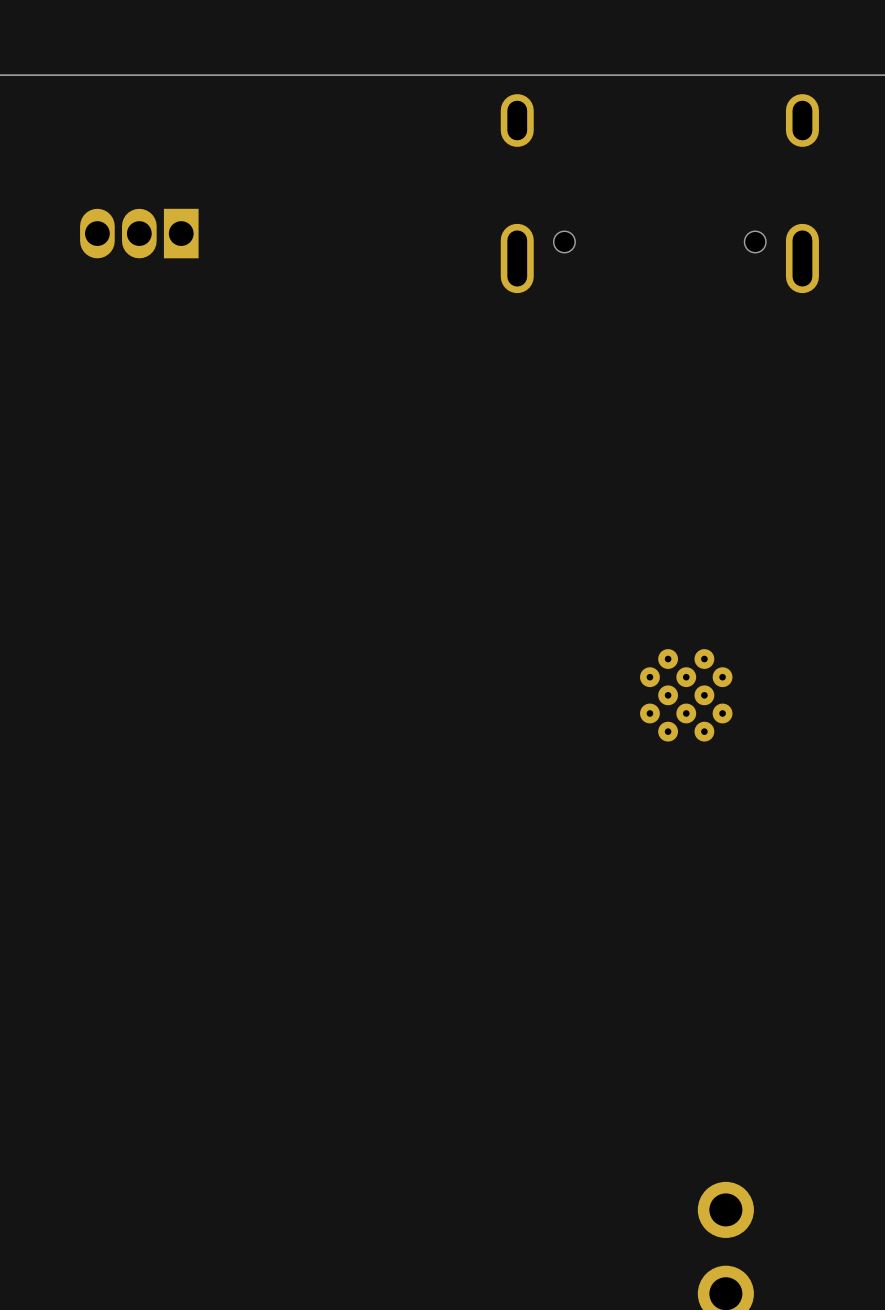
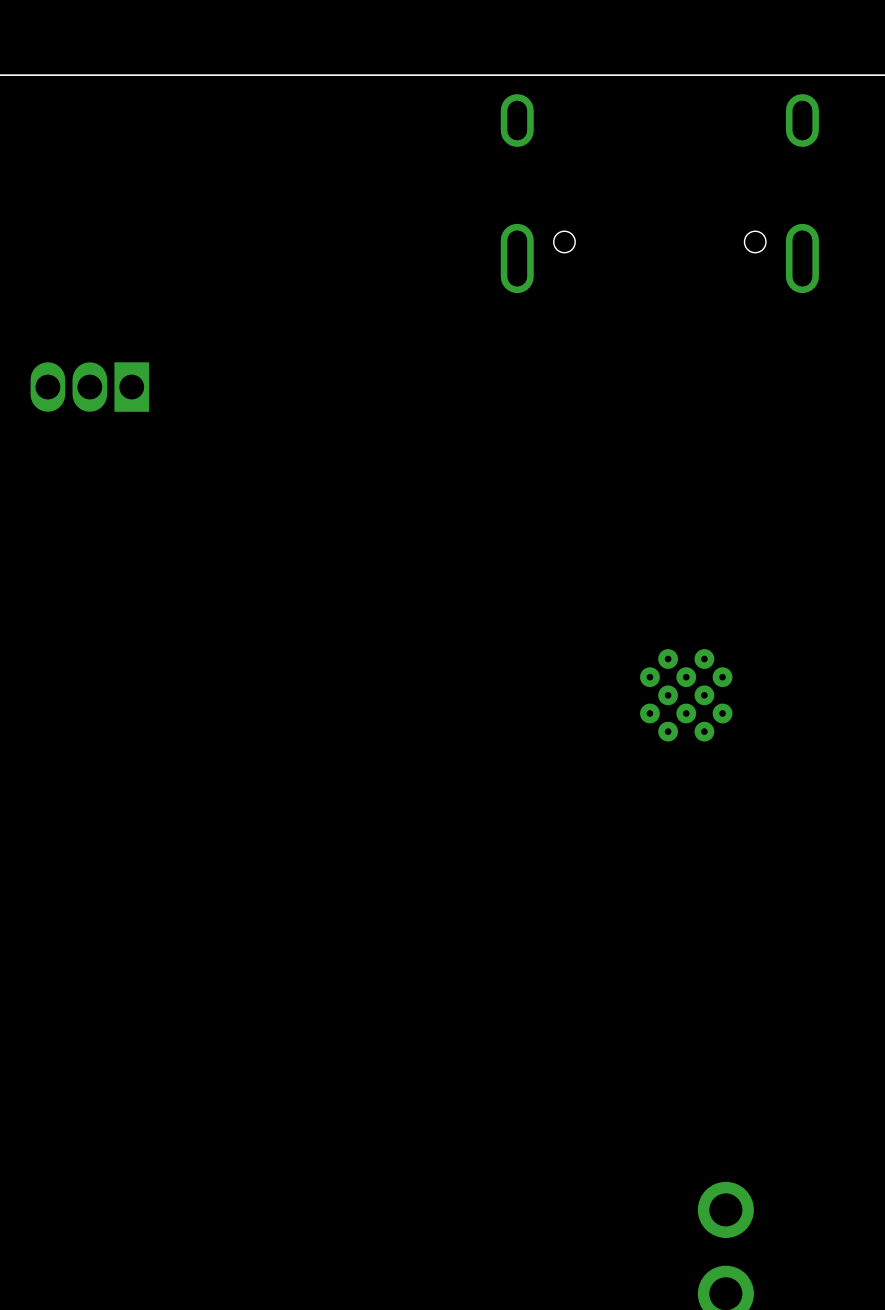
part position: (139, 233) -> (89, 387)

